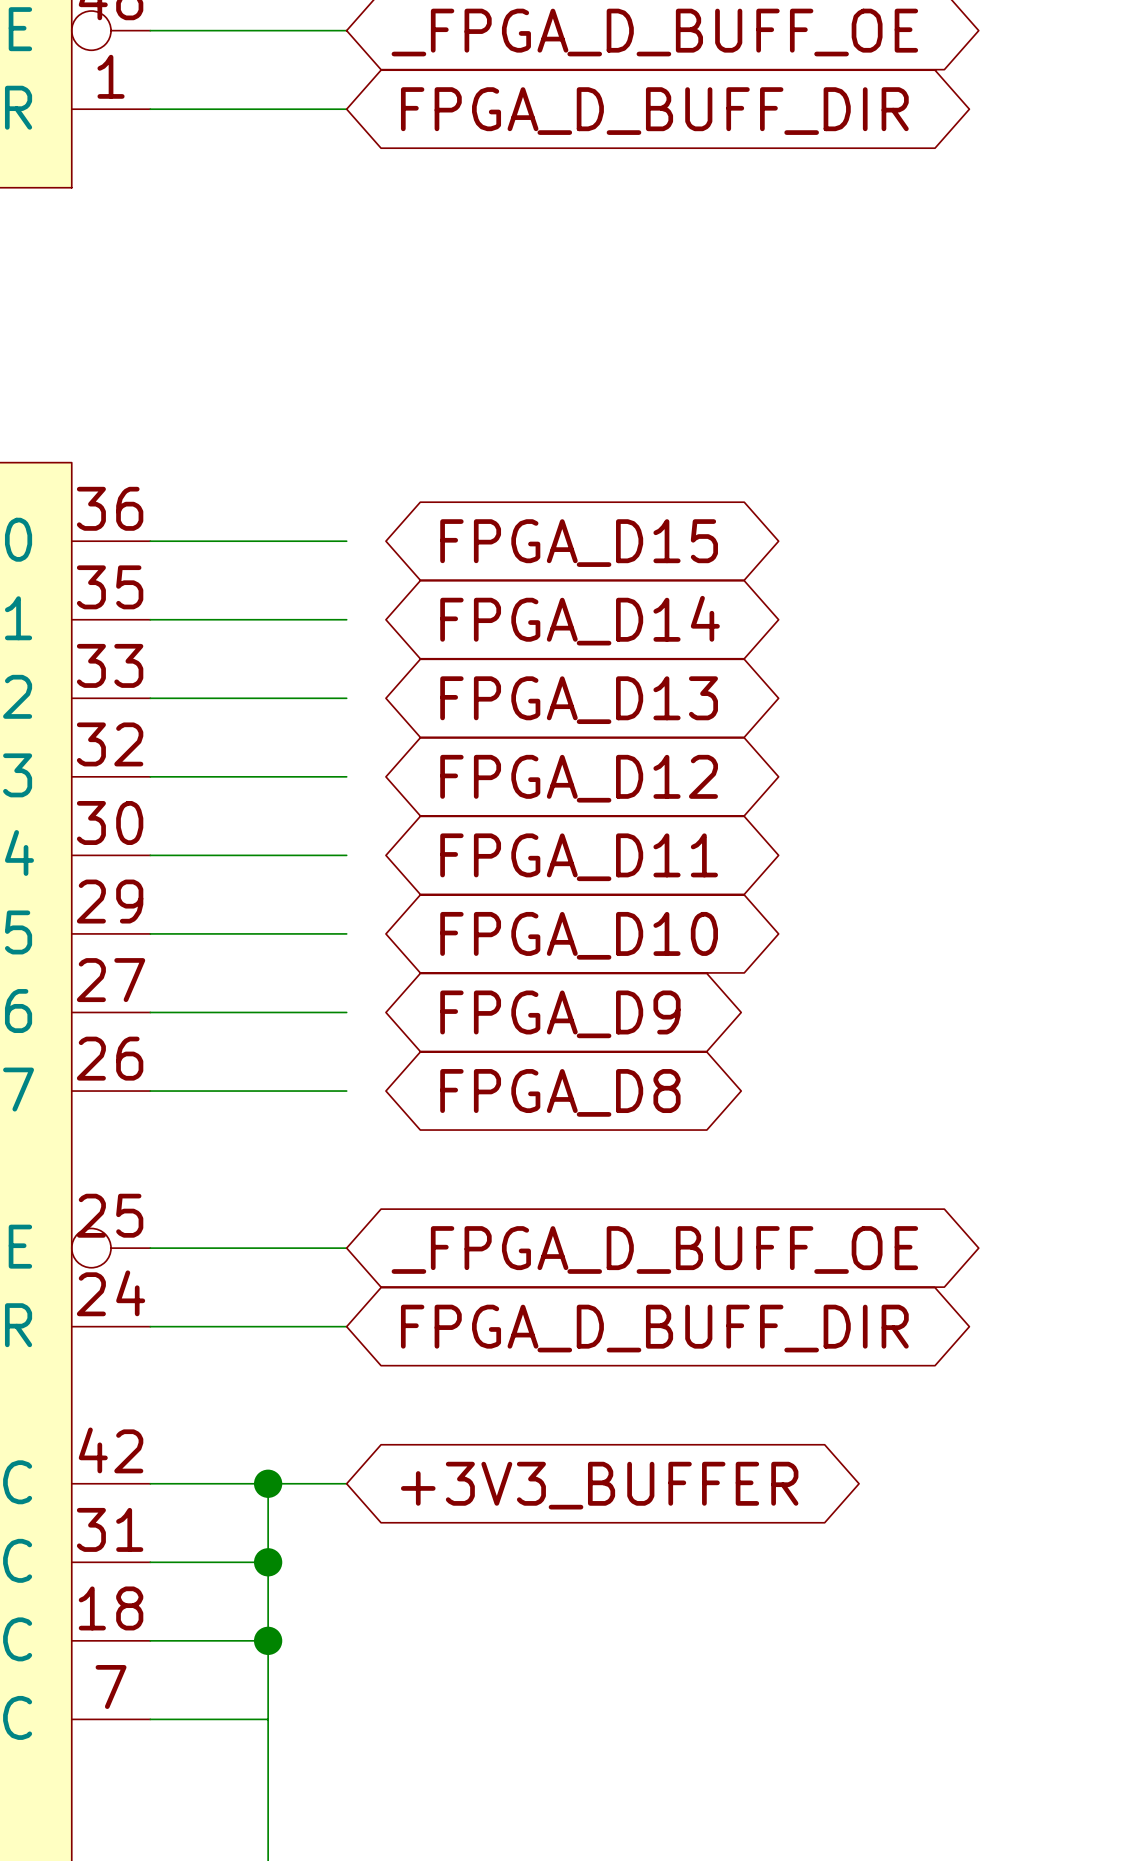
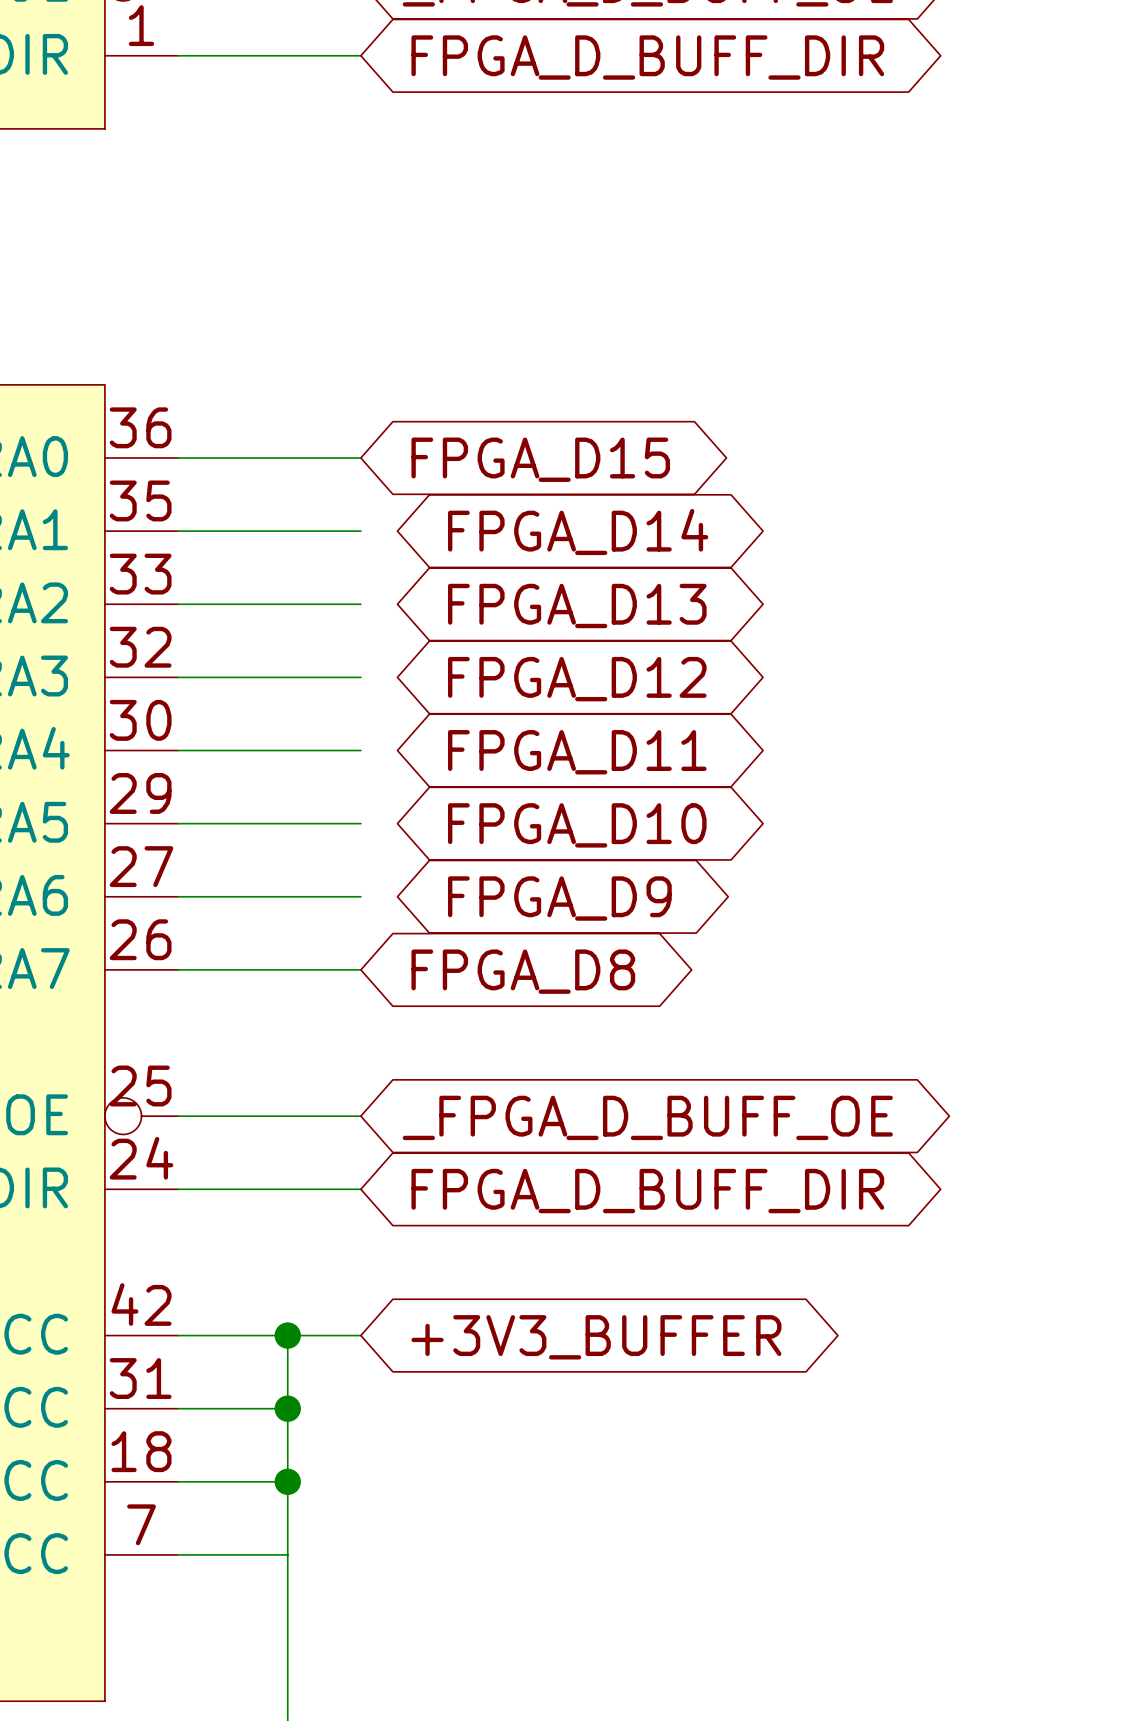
global label position: FPGA_D15 (579, 543) -> FPGA_D15 (540, 459)
global label position: FPGA_D8 (560, 1092) -> FPGA_D8 (523, 971)

